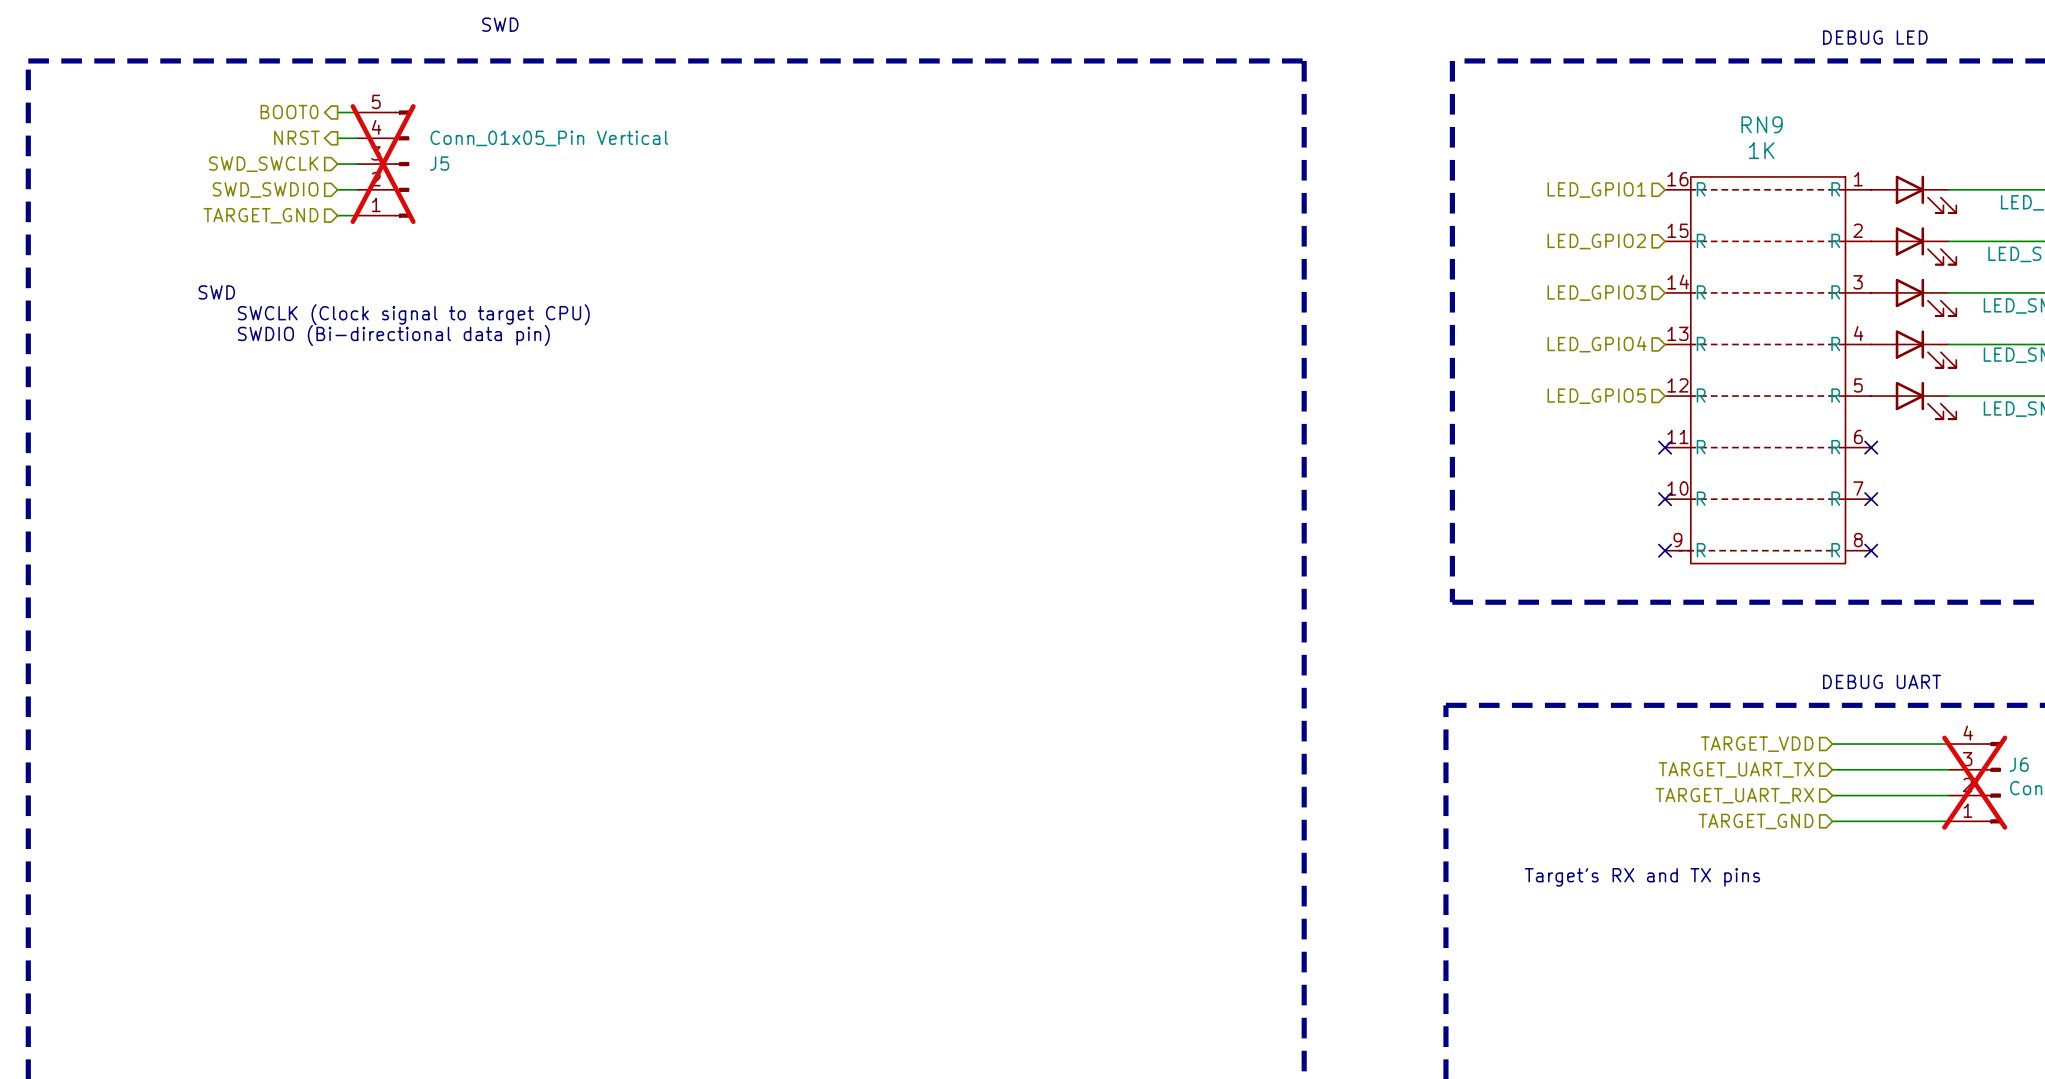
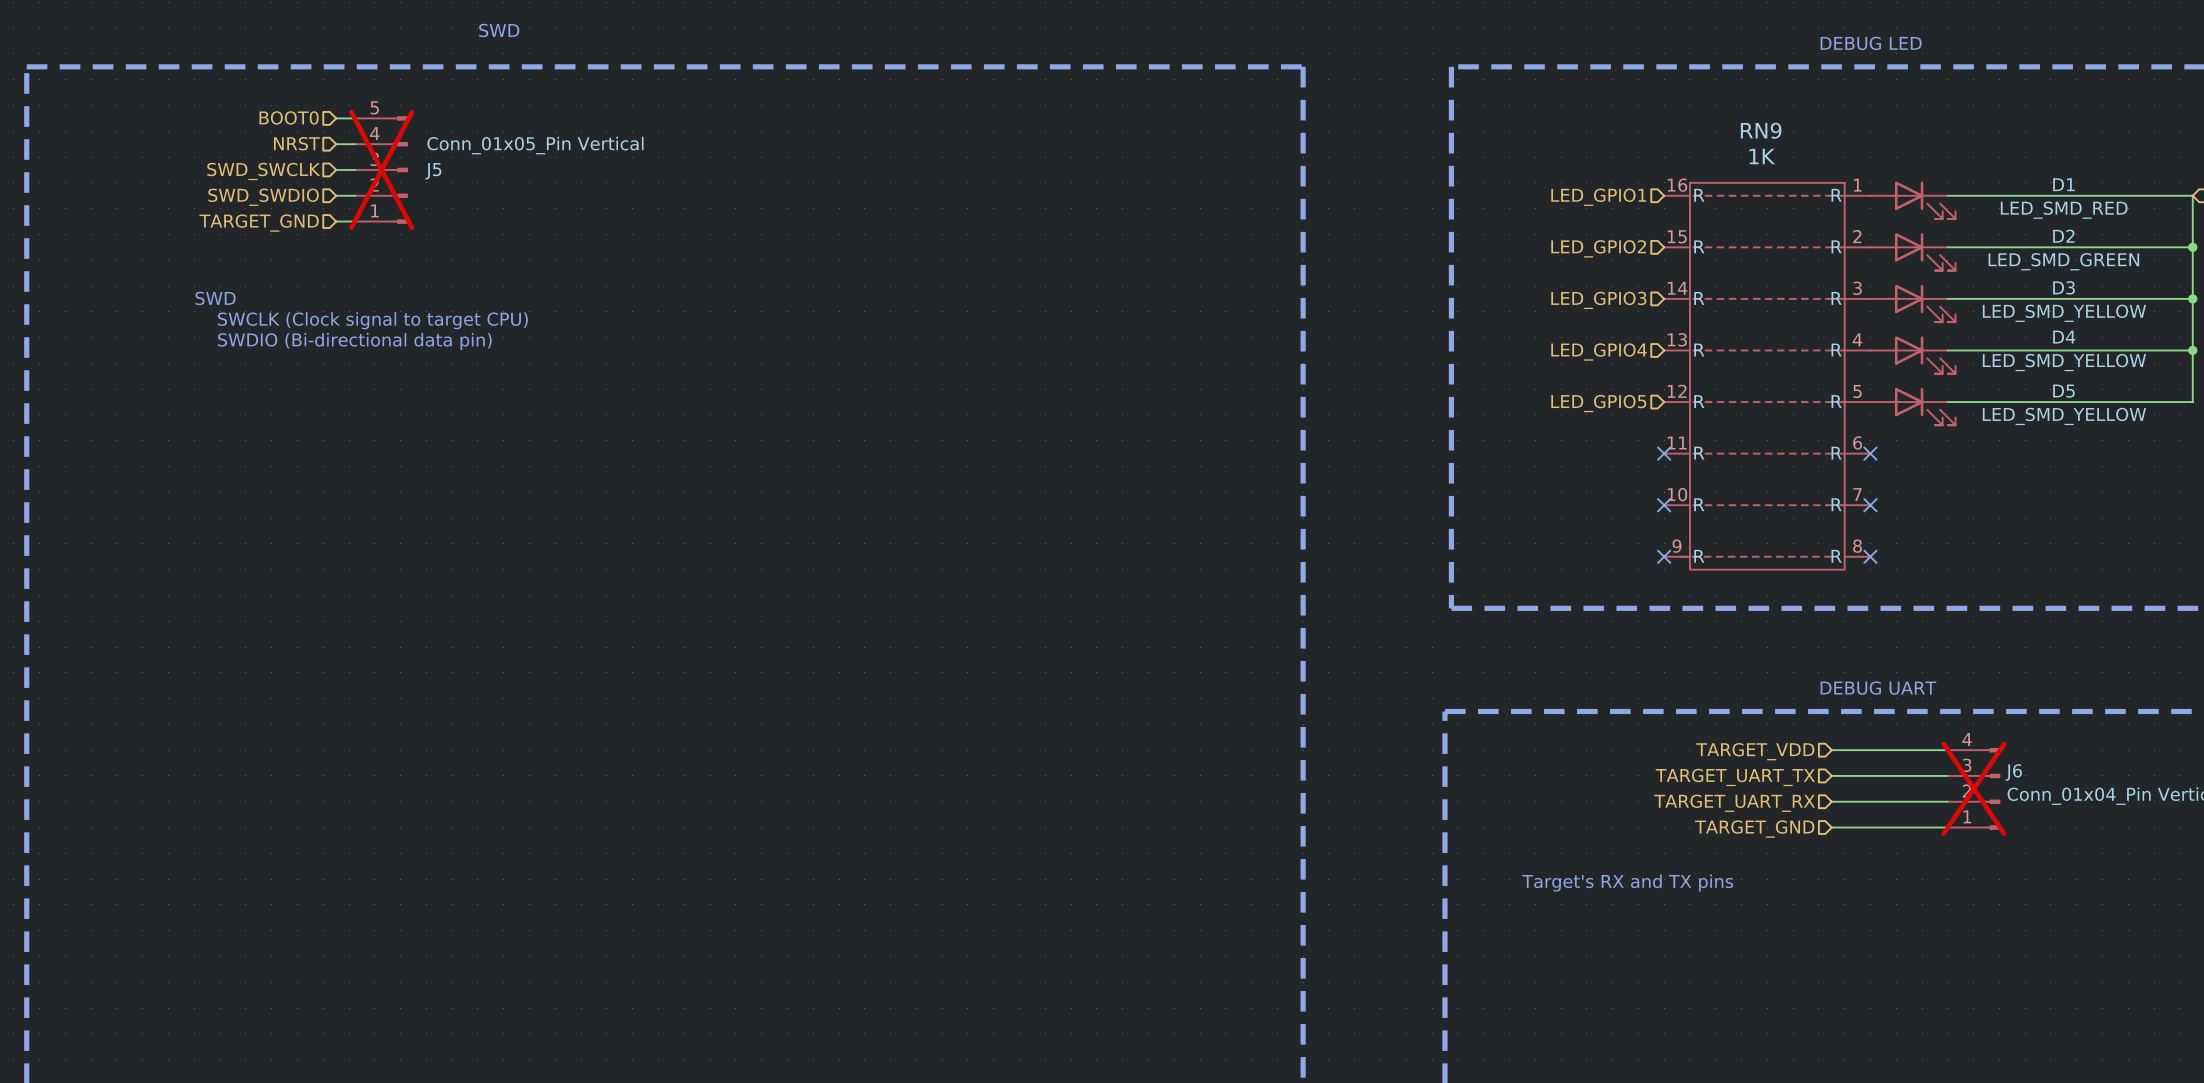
hierarchical label shape: output (289, 112) -> input (289, 117)
hierarchical label shape: output (296, 137) -> input (296, 143)

